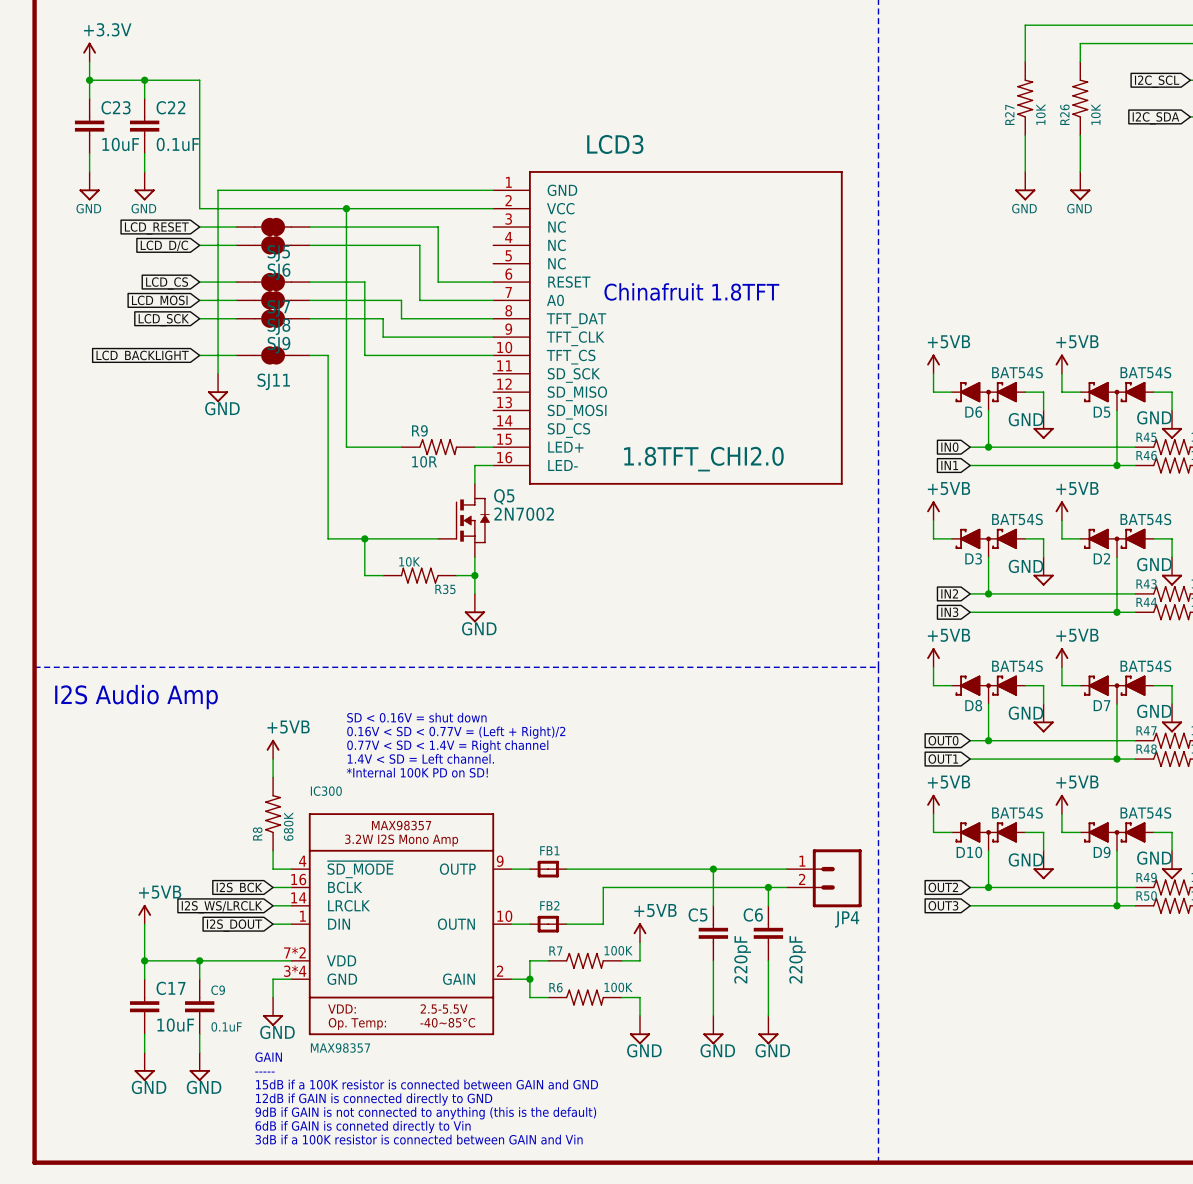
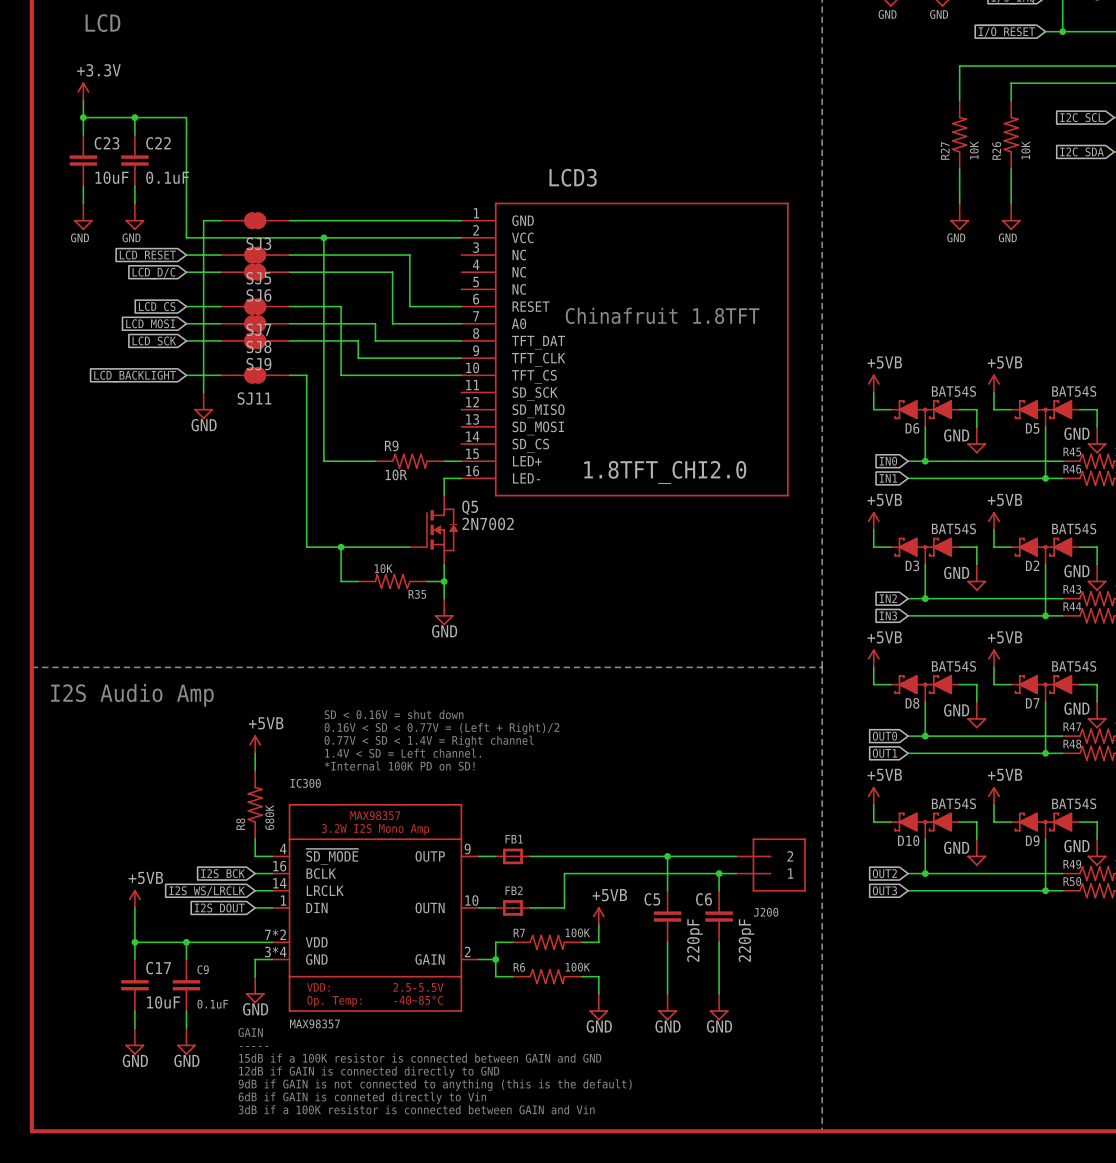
SJ3: none -> (255, 220)
J200: none -> (771, 865)
JP4: (824, 878) -> none

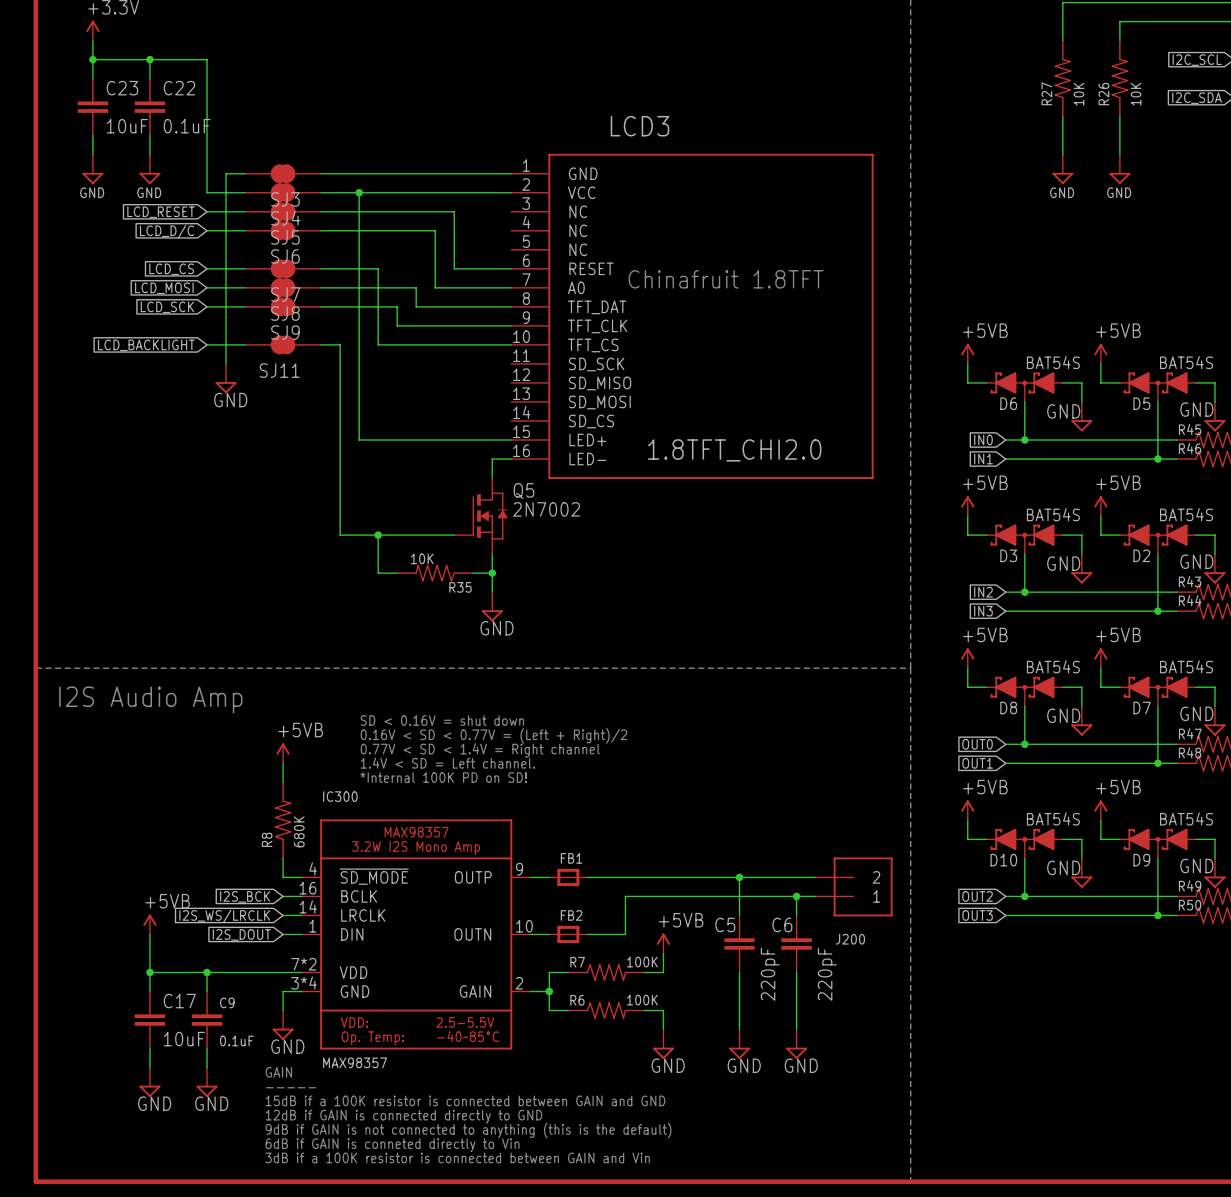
SJ4: none -> (283, 192)
R9: 10R (409, 461) -> none

